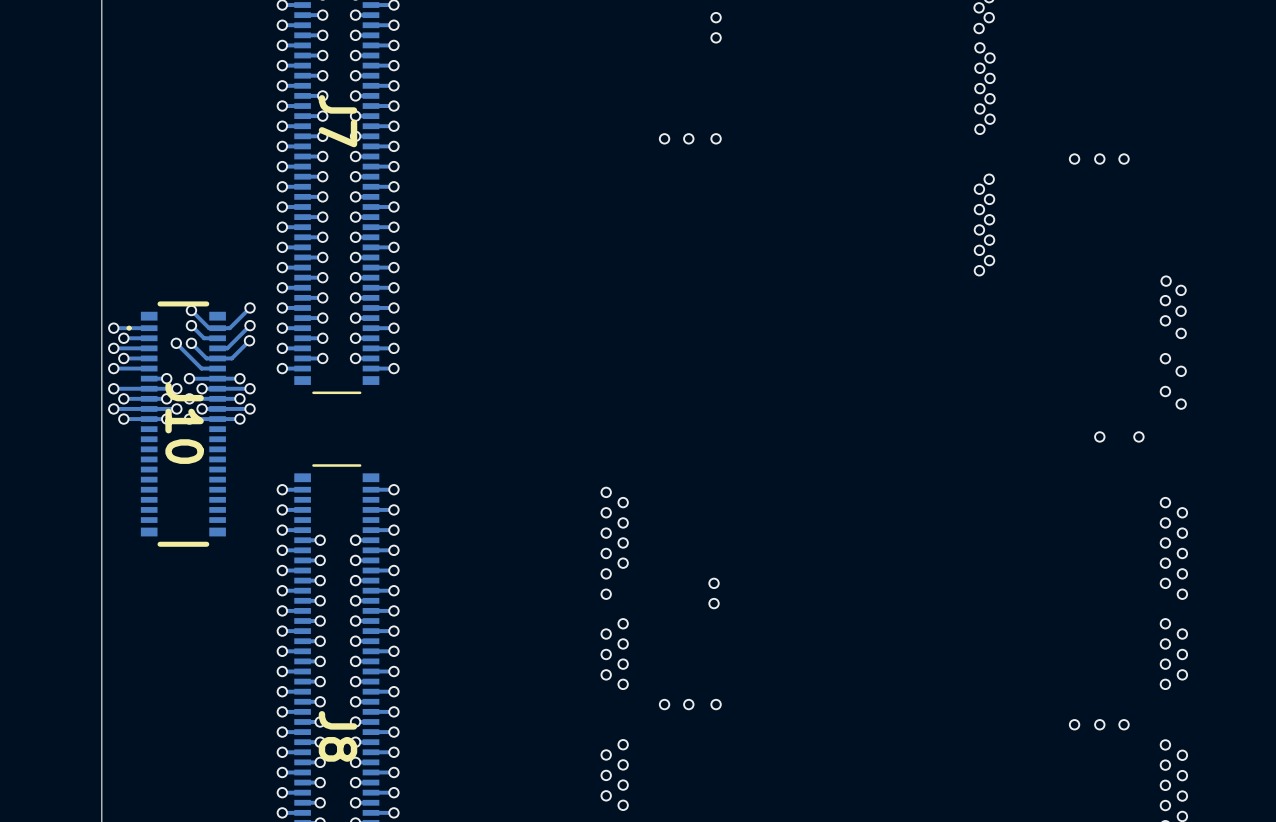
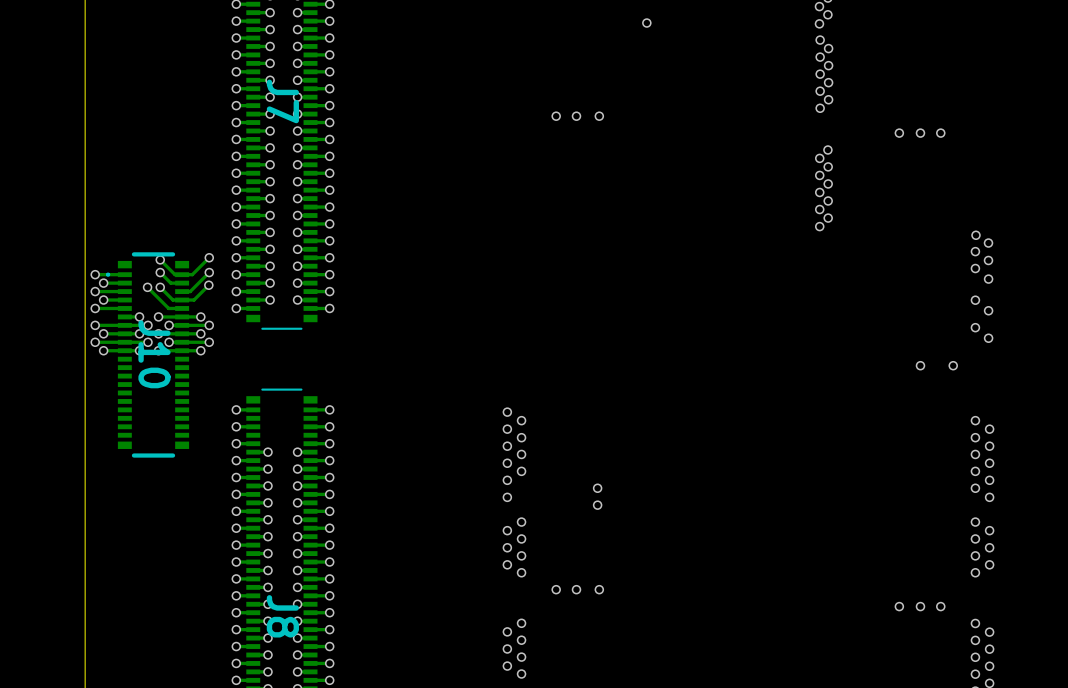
via: (716, 17) -> none
via: none -> (646, 23)
via: (716, 37) -> none

